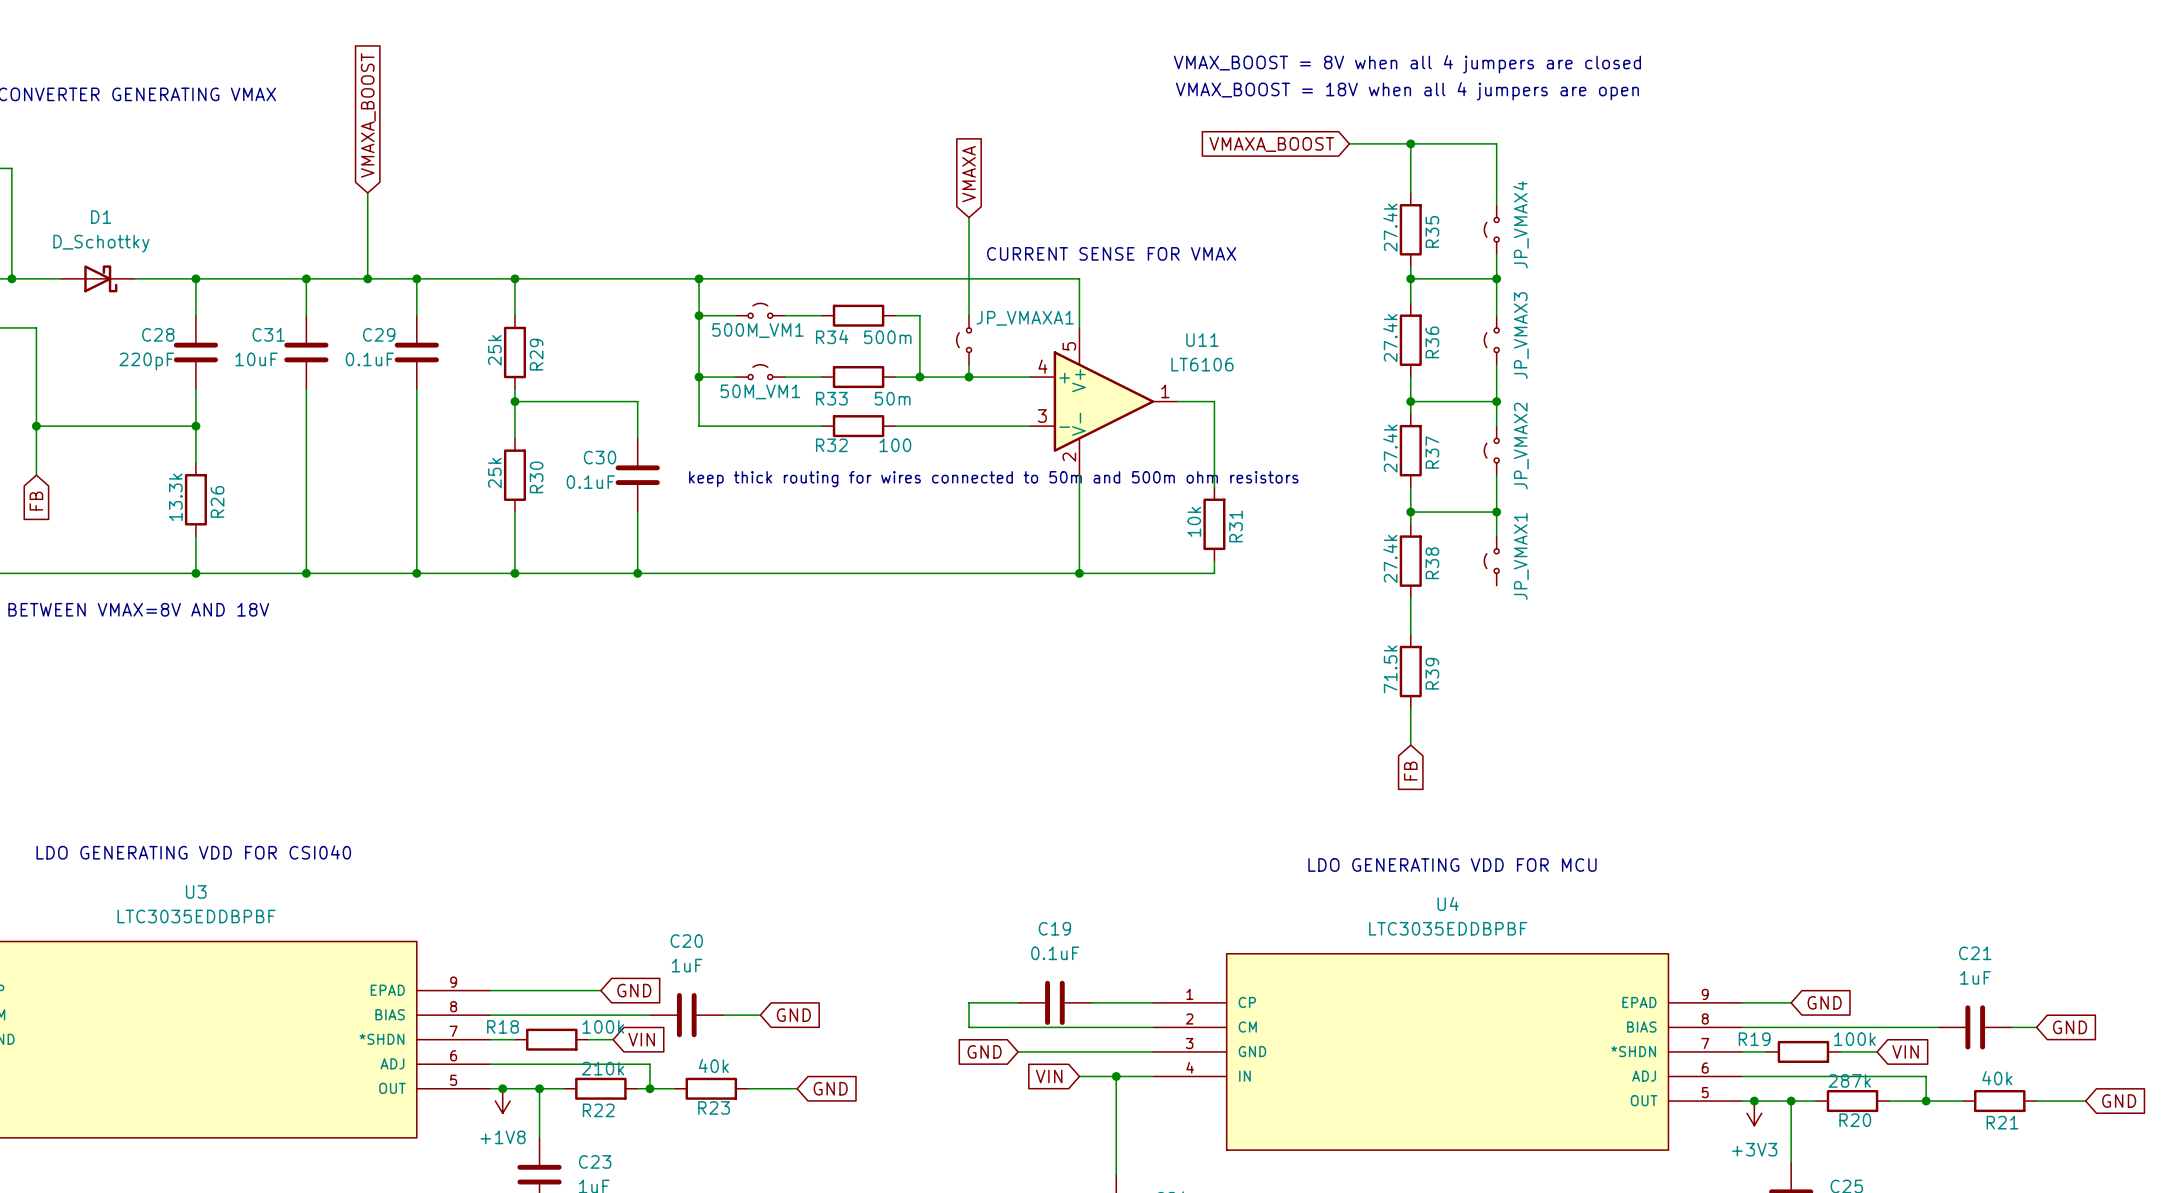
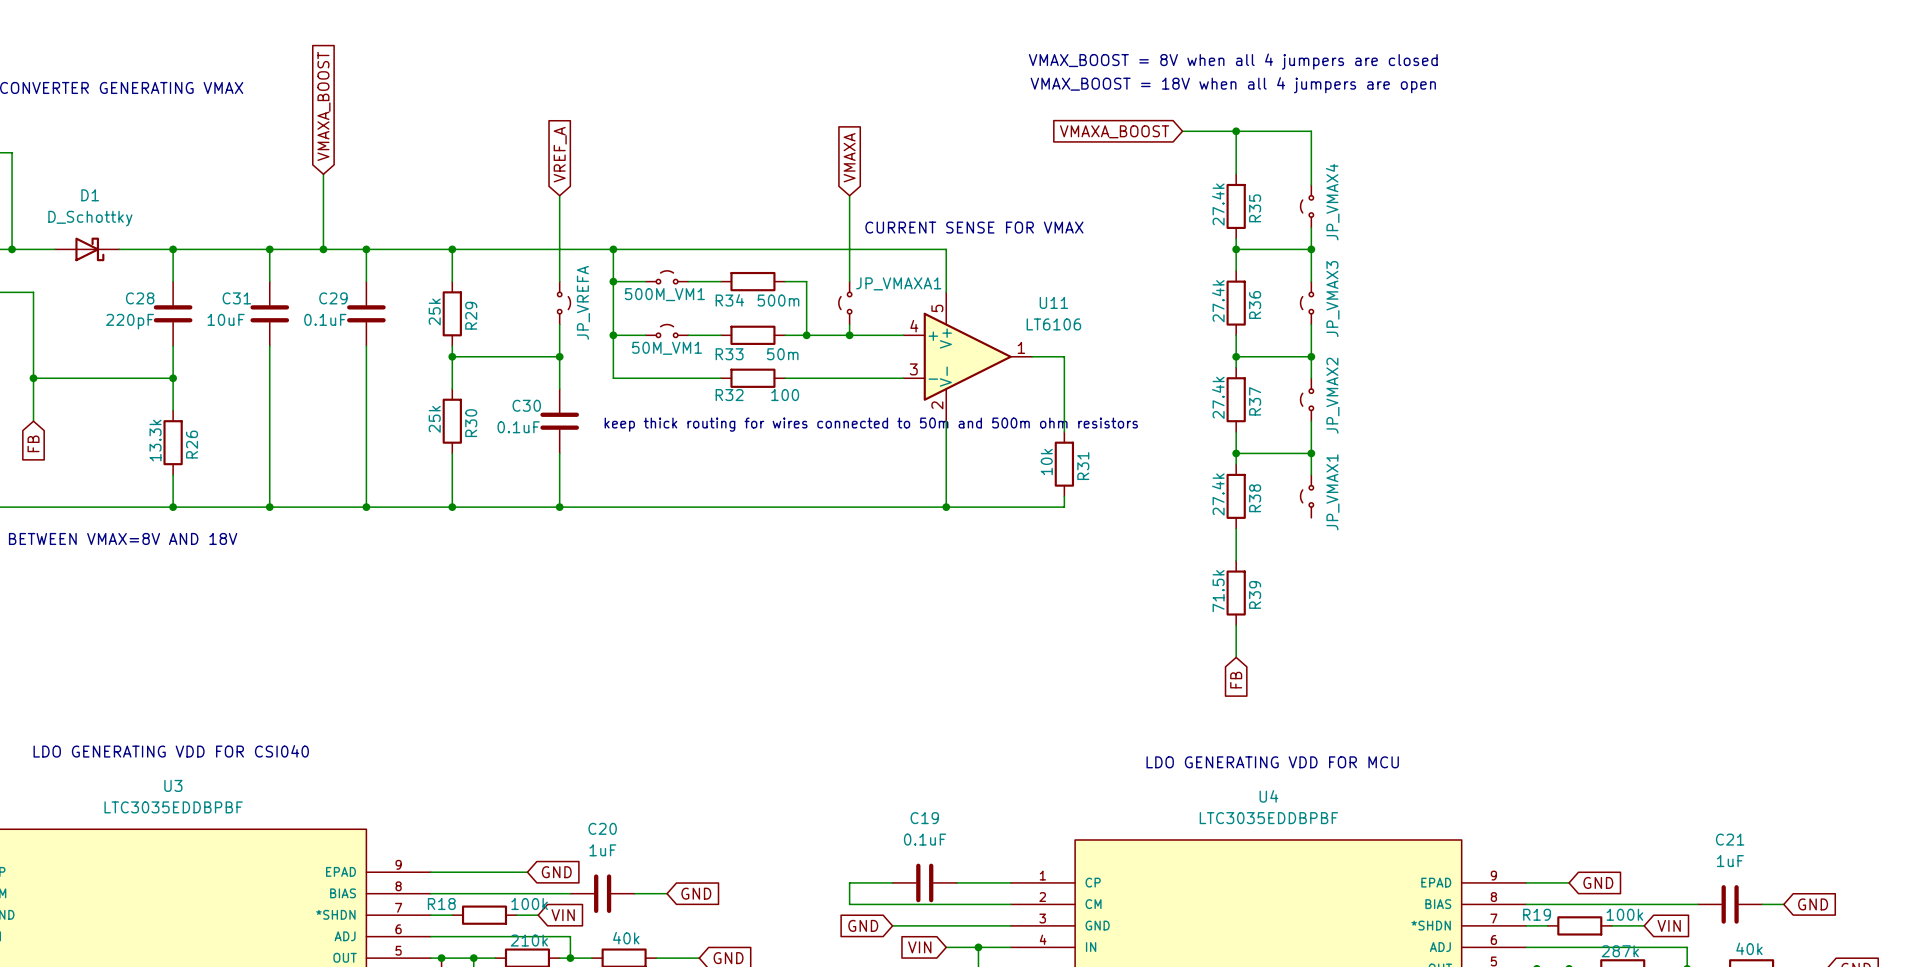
global label: none -> VREF_A (560, 154)
wire: none -> (559, 195) (559, 281)
JP_VREFA: none -> (563, 303)
wire: none -> (559, 324) (559, 356)
junction: none -> (559, 356)

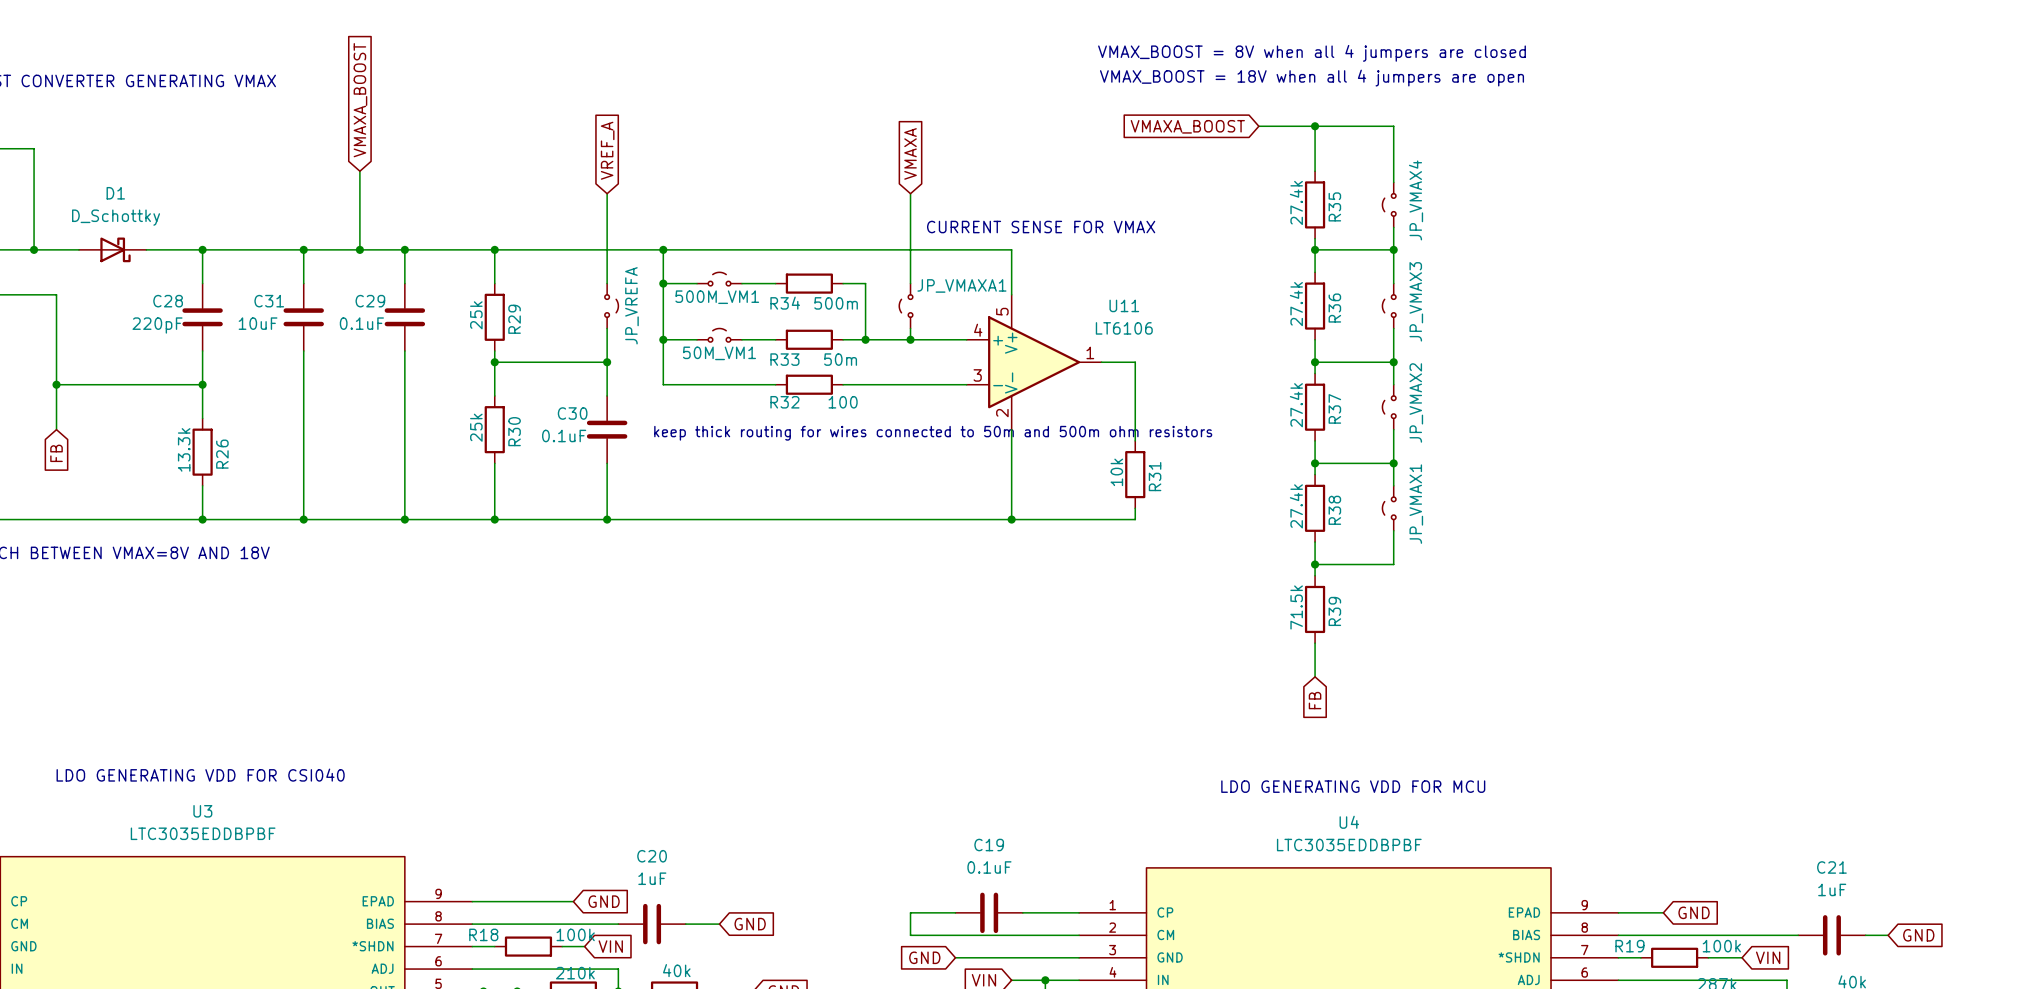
wire: none -> (1393, 530) (1393, 564) (1315, 564)
junction: none -> (1315, 564)

